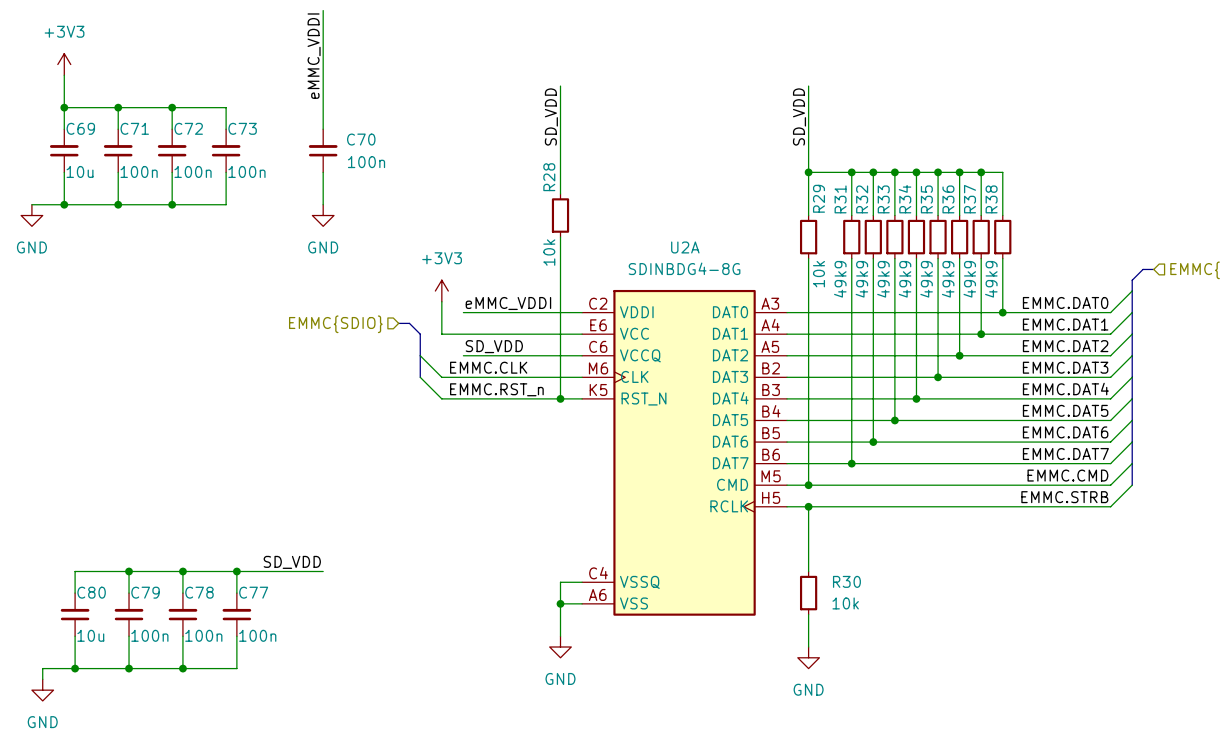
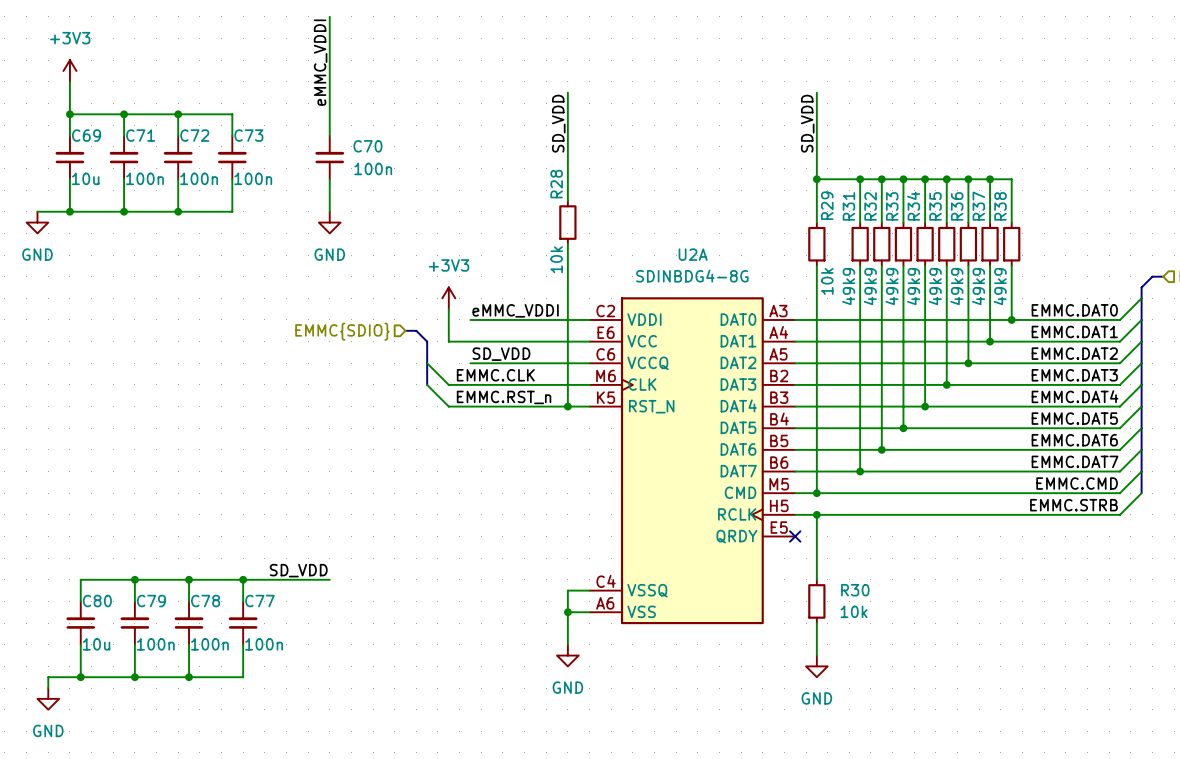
U2A symbol: [582, 289, 788, 616] -> [589, 297, 796, 625]
no-connect mark: none -> (795, 536)

